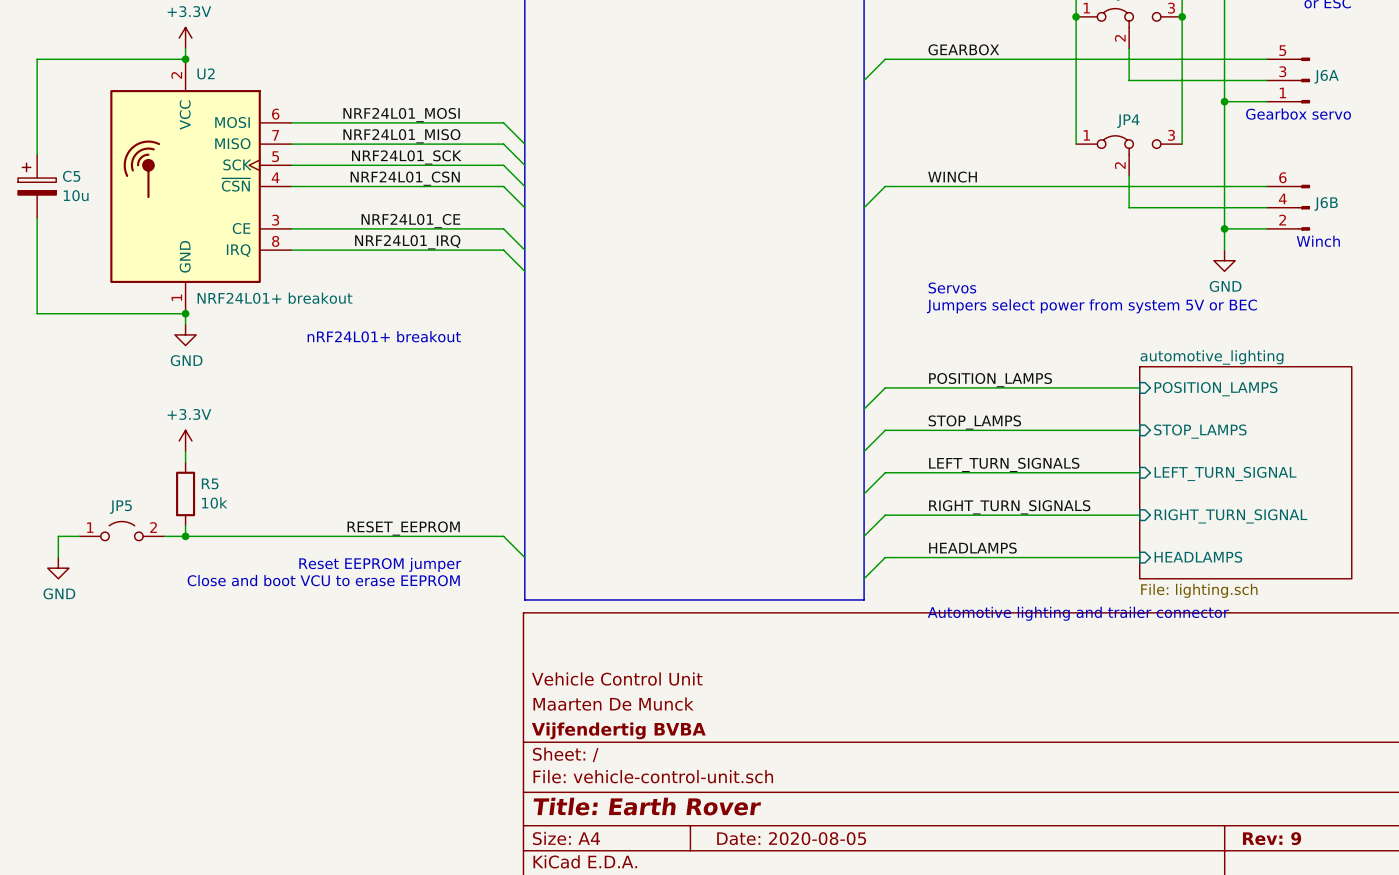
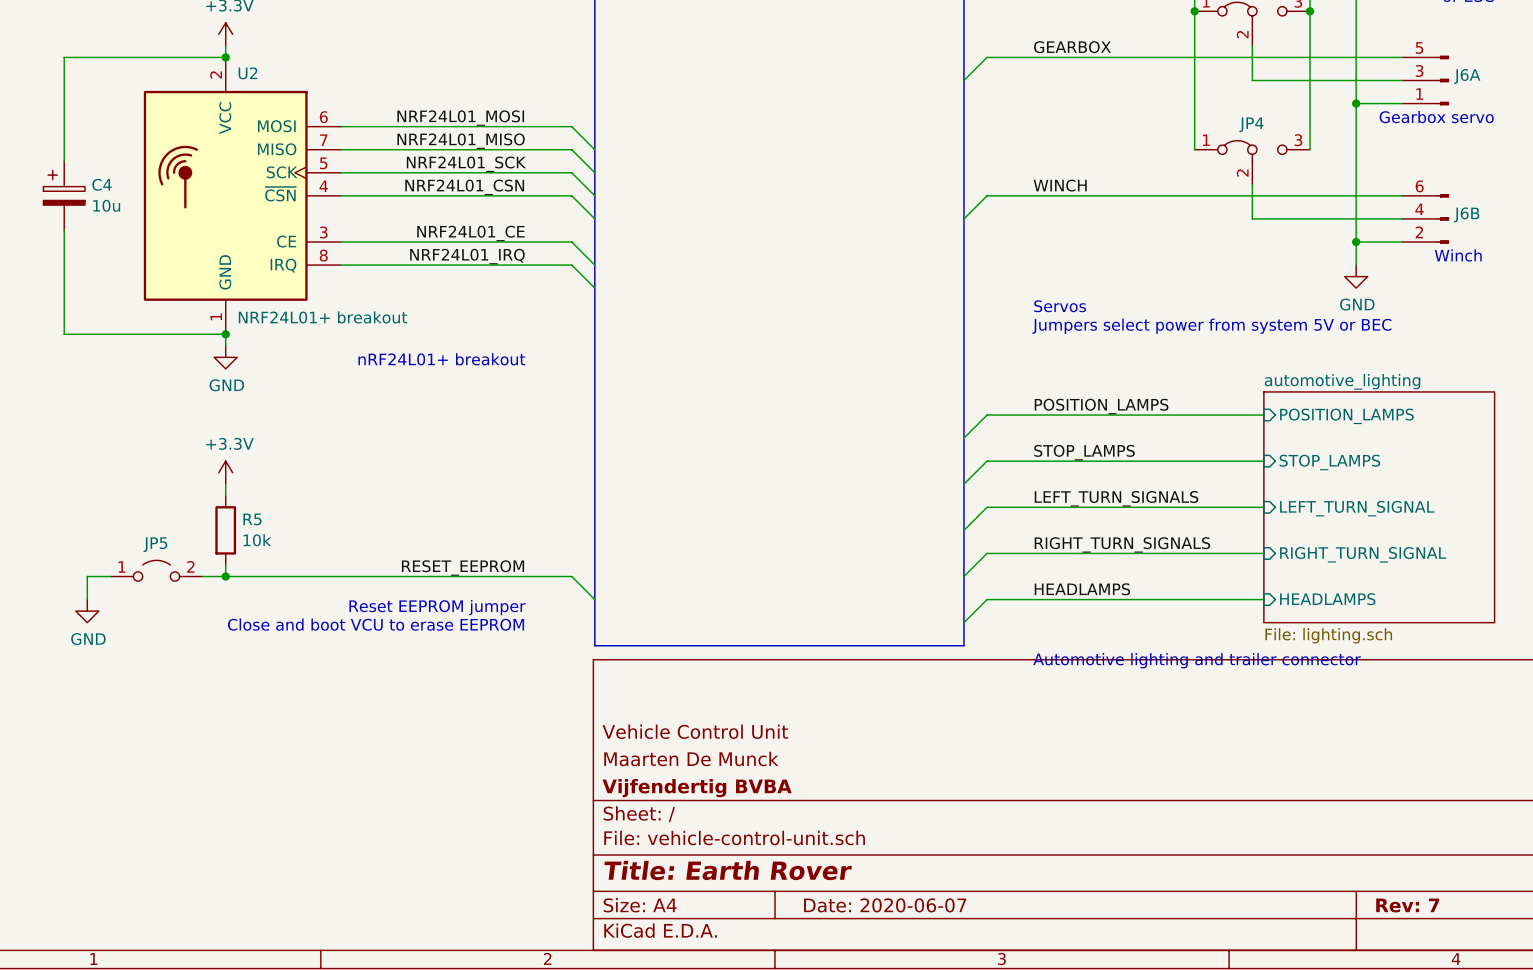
C5 name: C5 (71, 176) -> C4 (102, 184)
title block: Date: 2020-08-05 (791, 838) -> Date: 2020-06-07 (885, 905)
title block: Rev: 9 (1272, 838) -> Rev: 7 (1407, 905)

